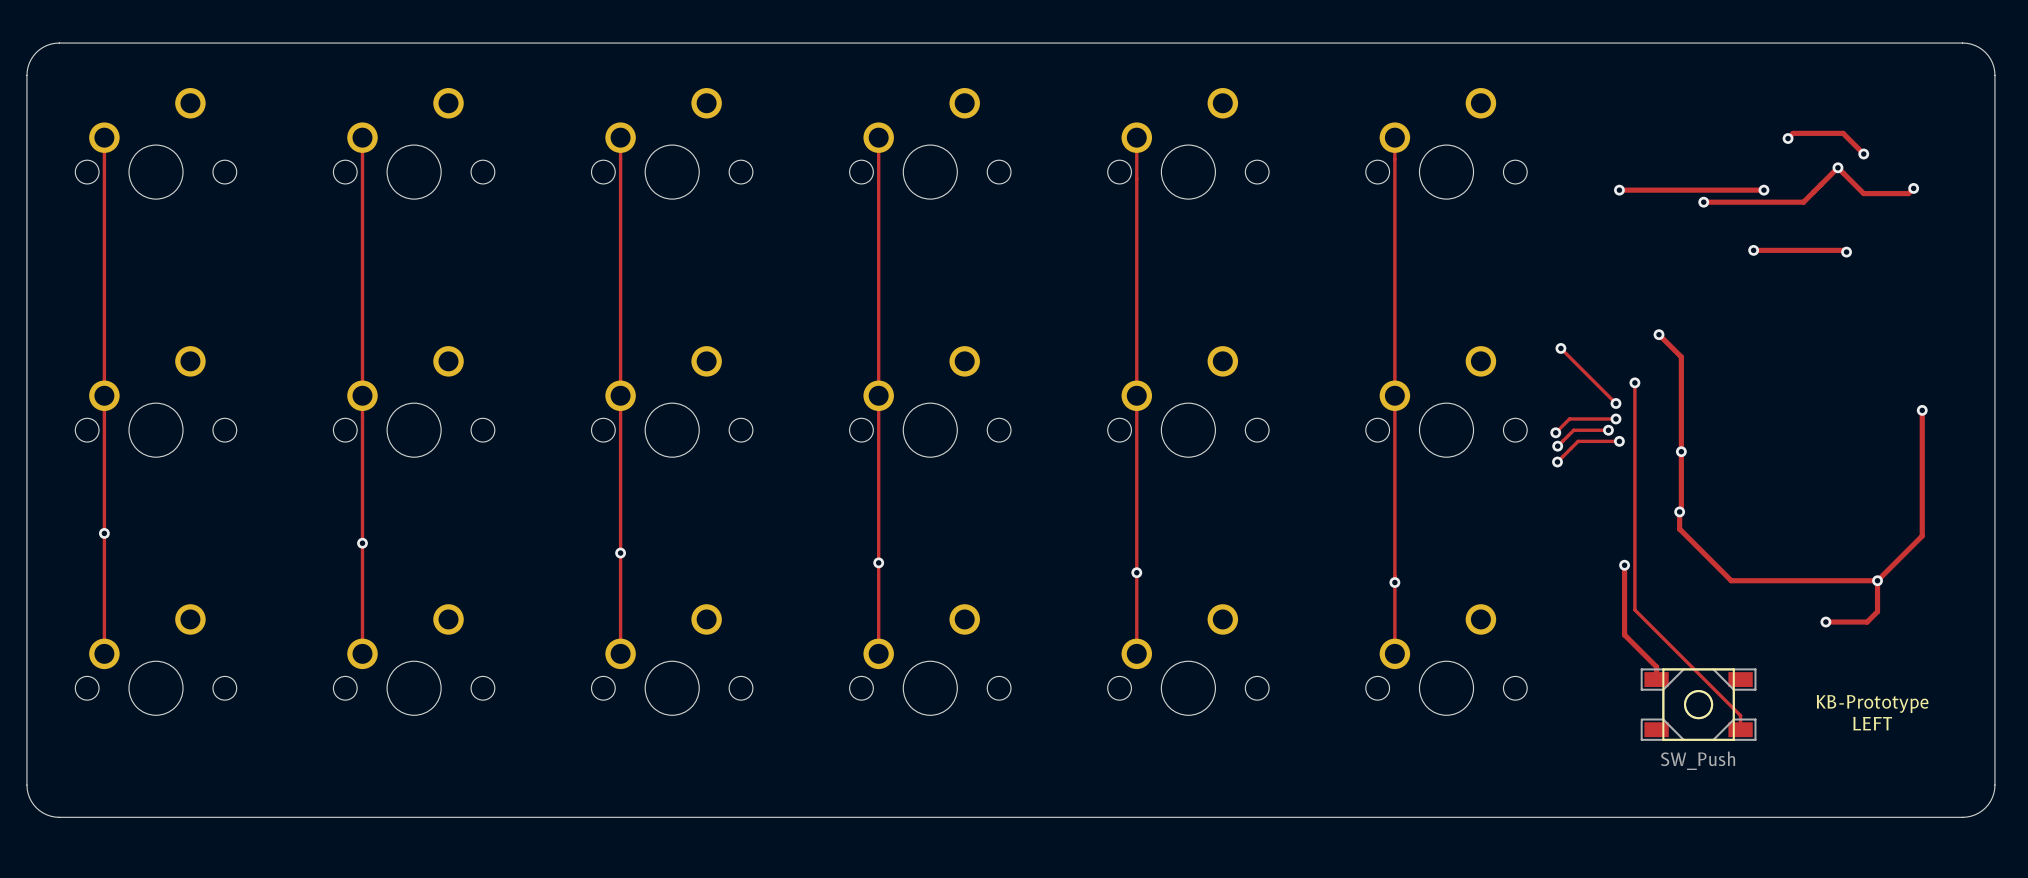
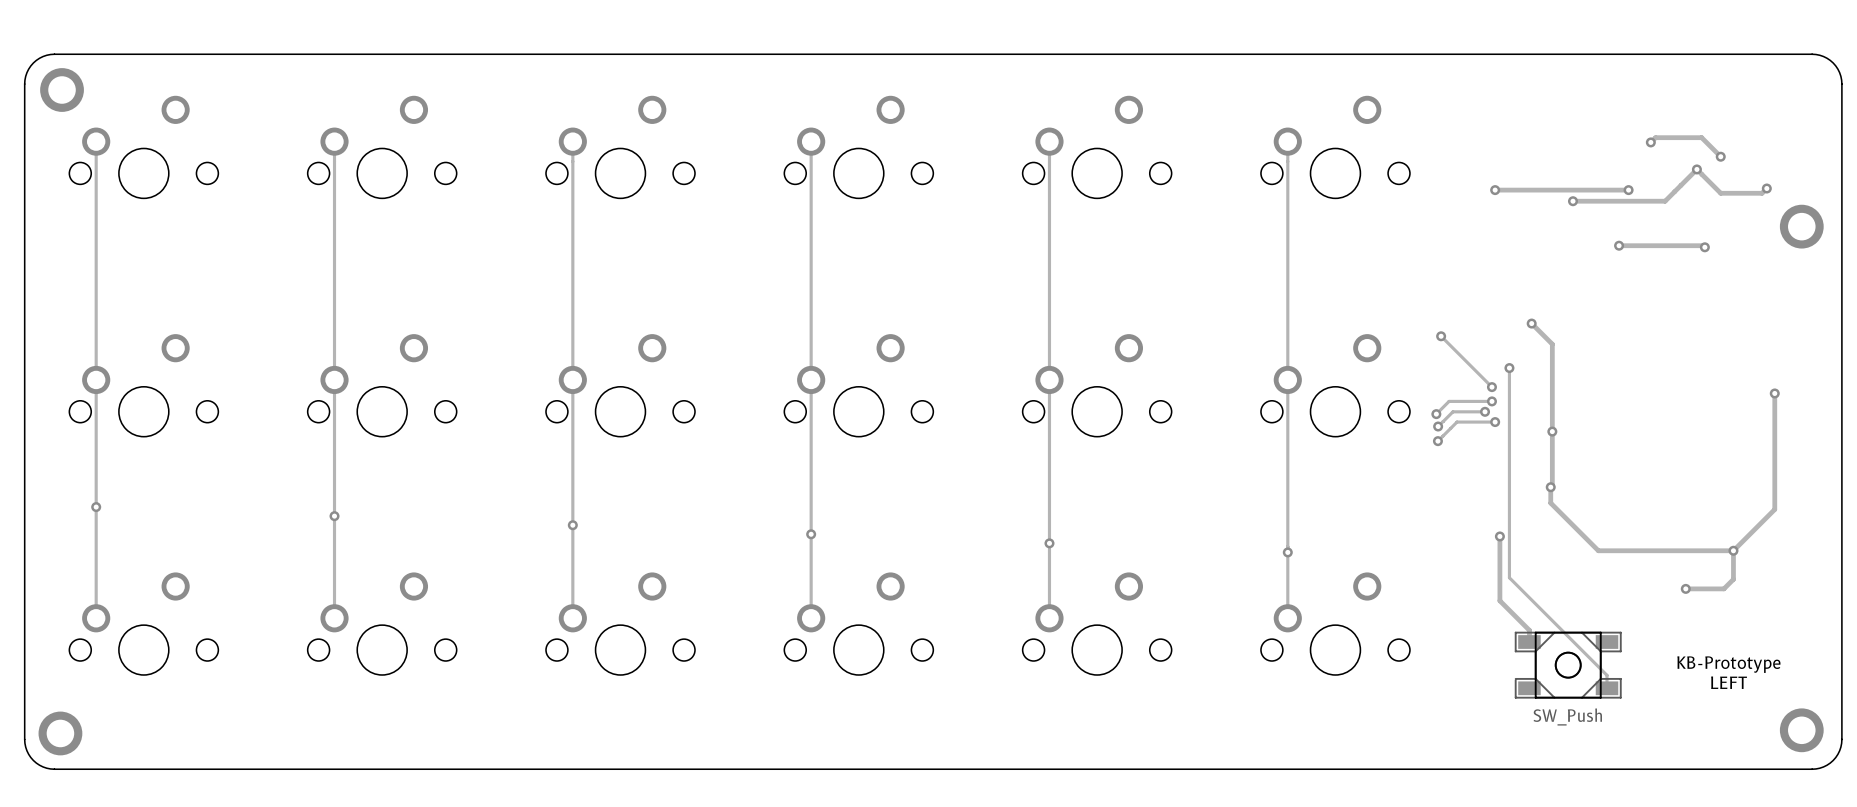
part: none -> (62, 90)
part: none -> (1801, 226)
part: none -> (1801, 730)
part: none -> (60, 733)

